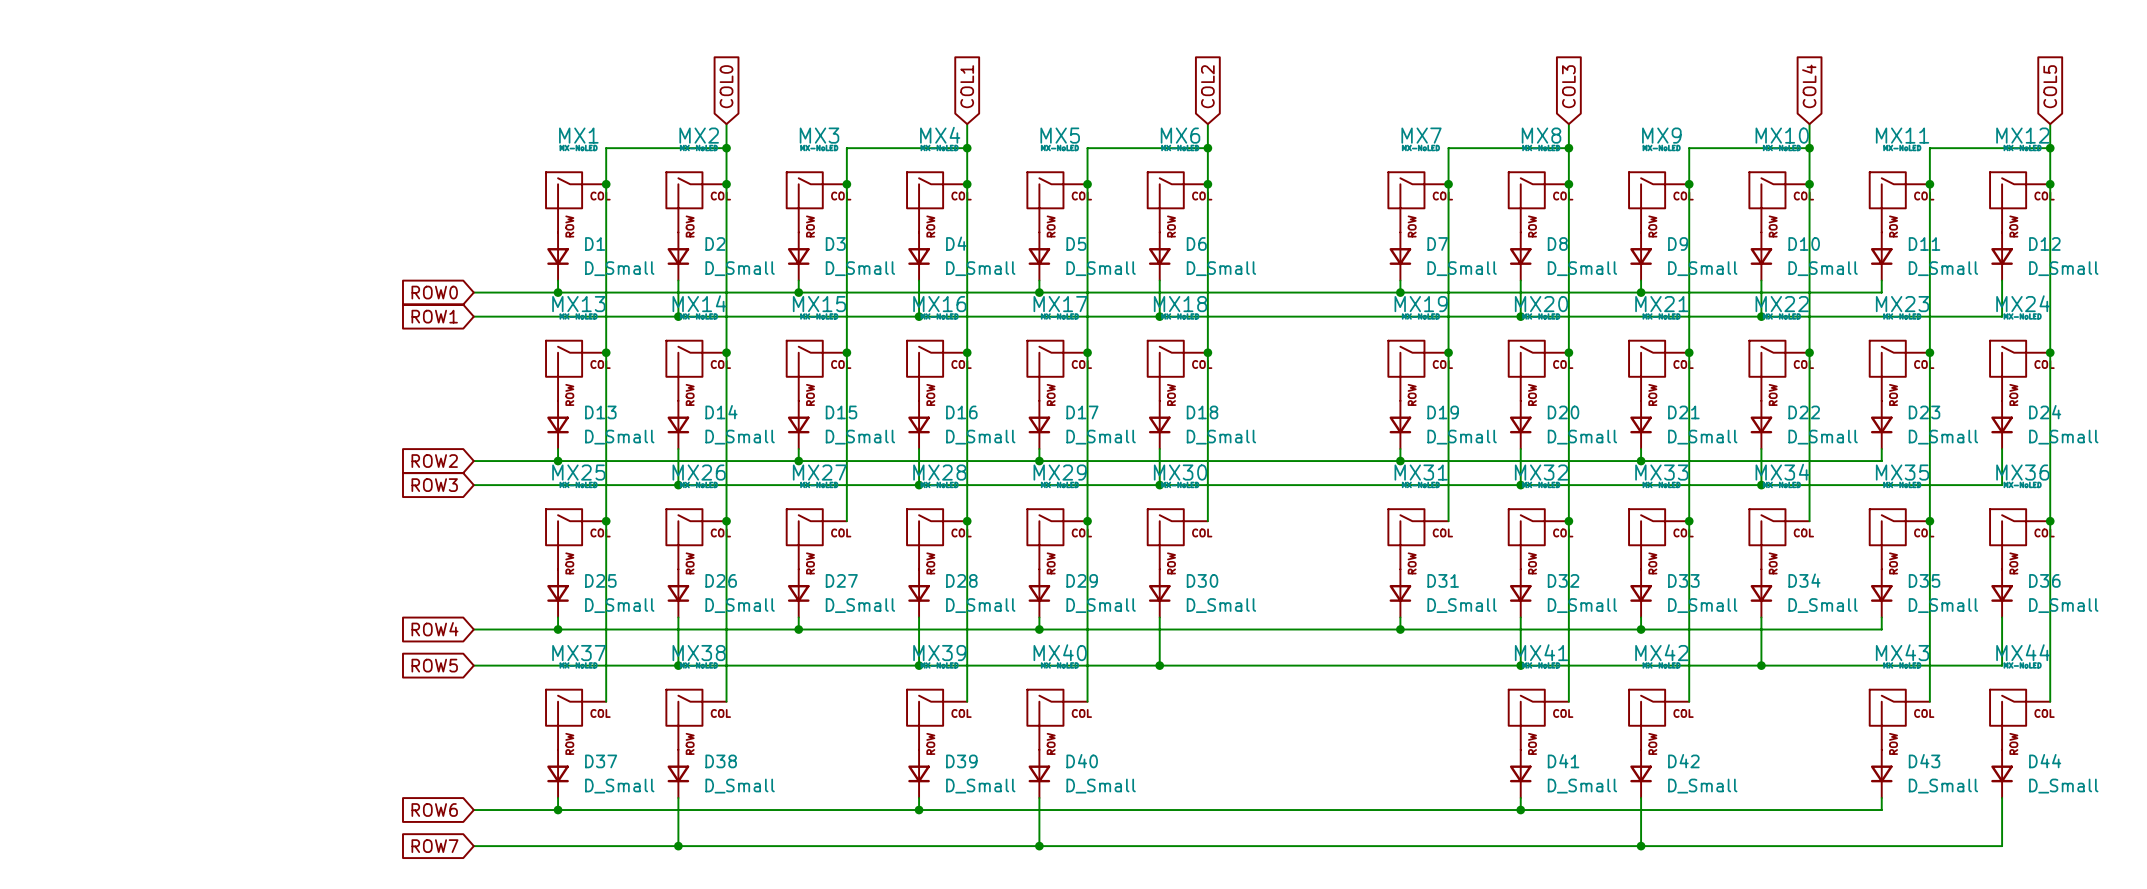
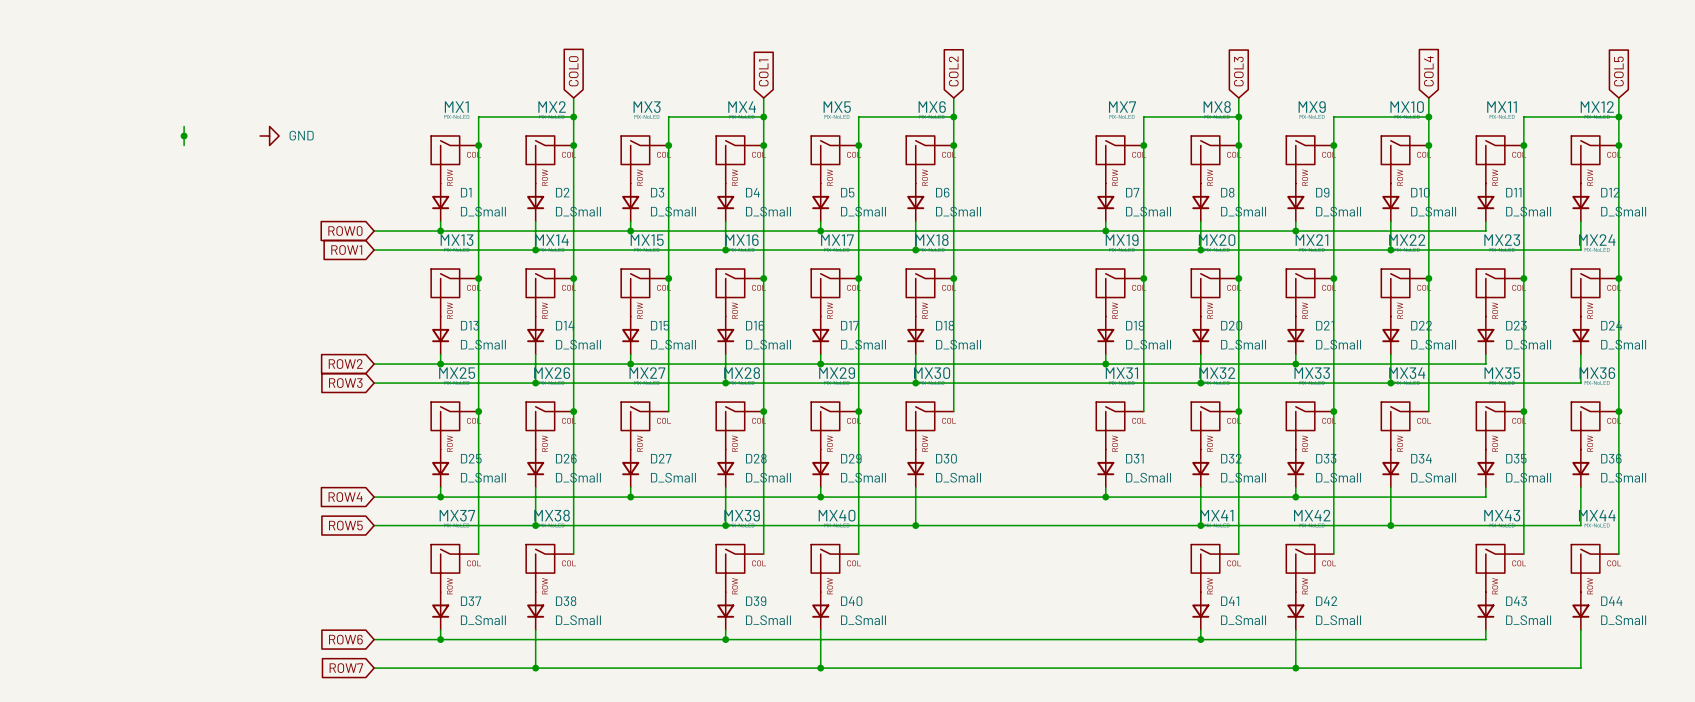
wire: none -> (184, 126) (184, 145)
junction: none -> (184, 135)
power symbol: none -> GND (269, 135)

